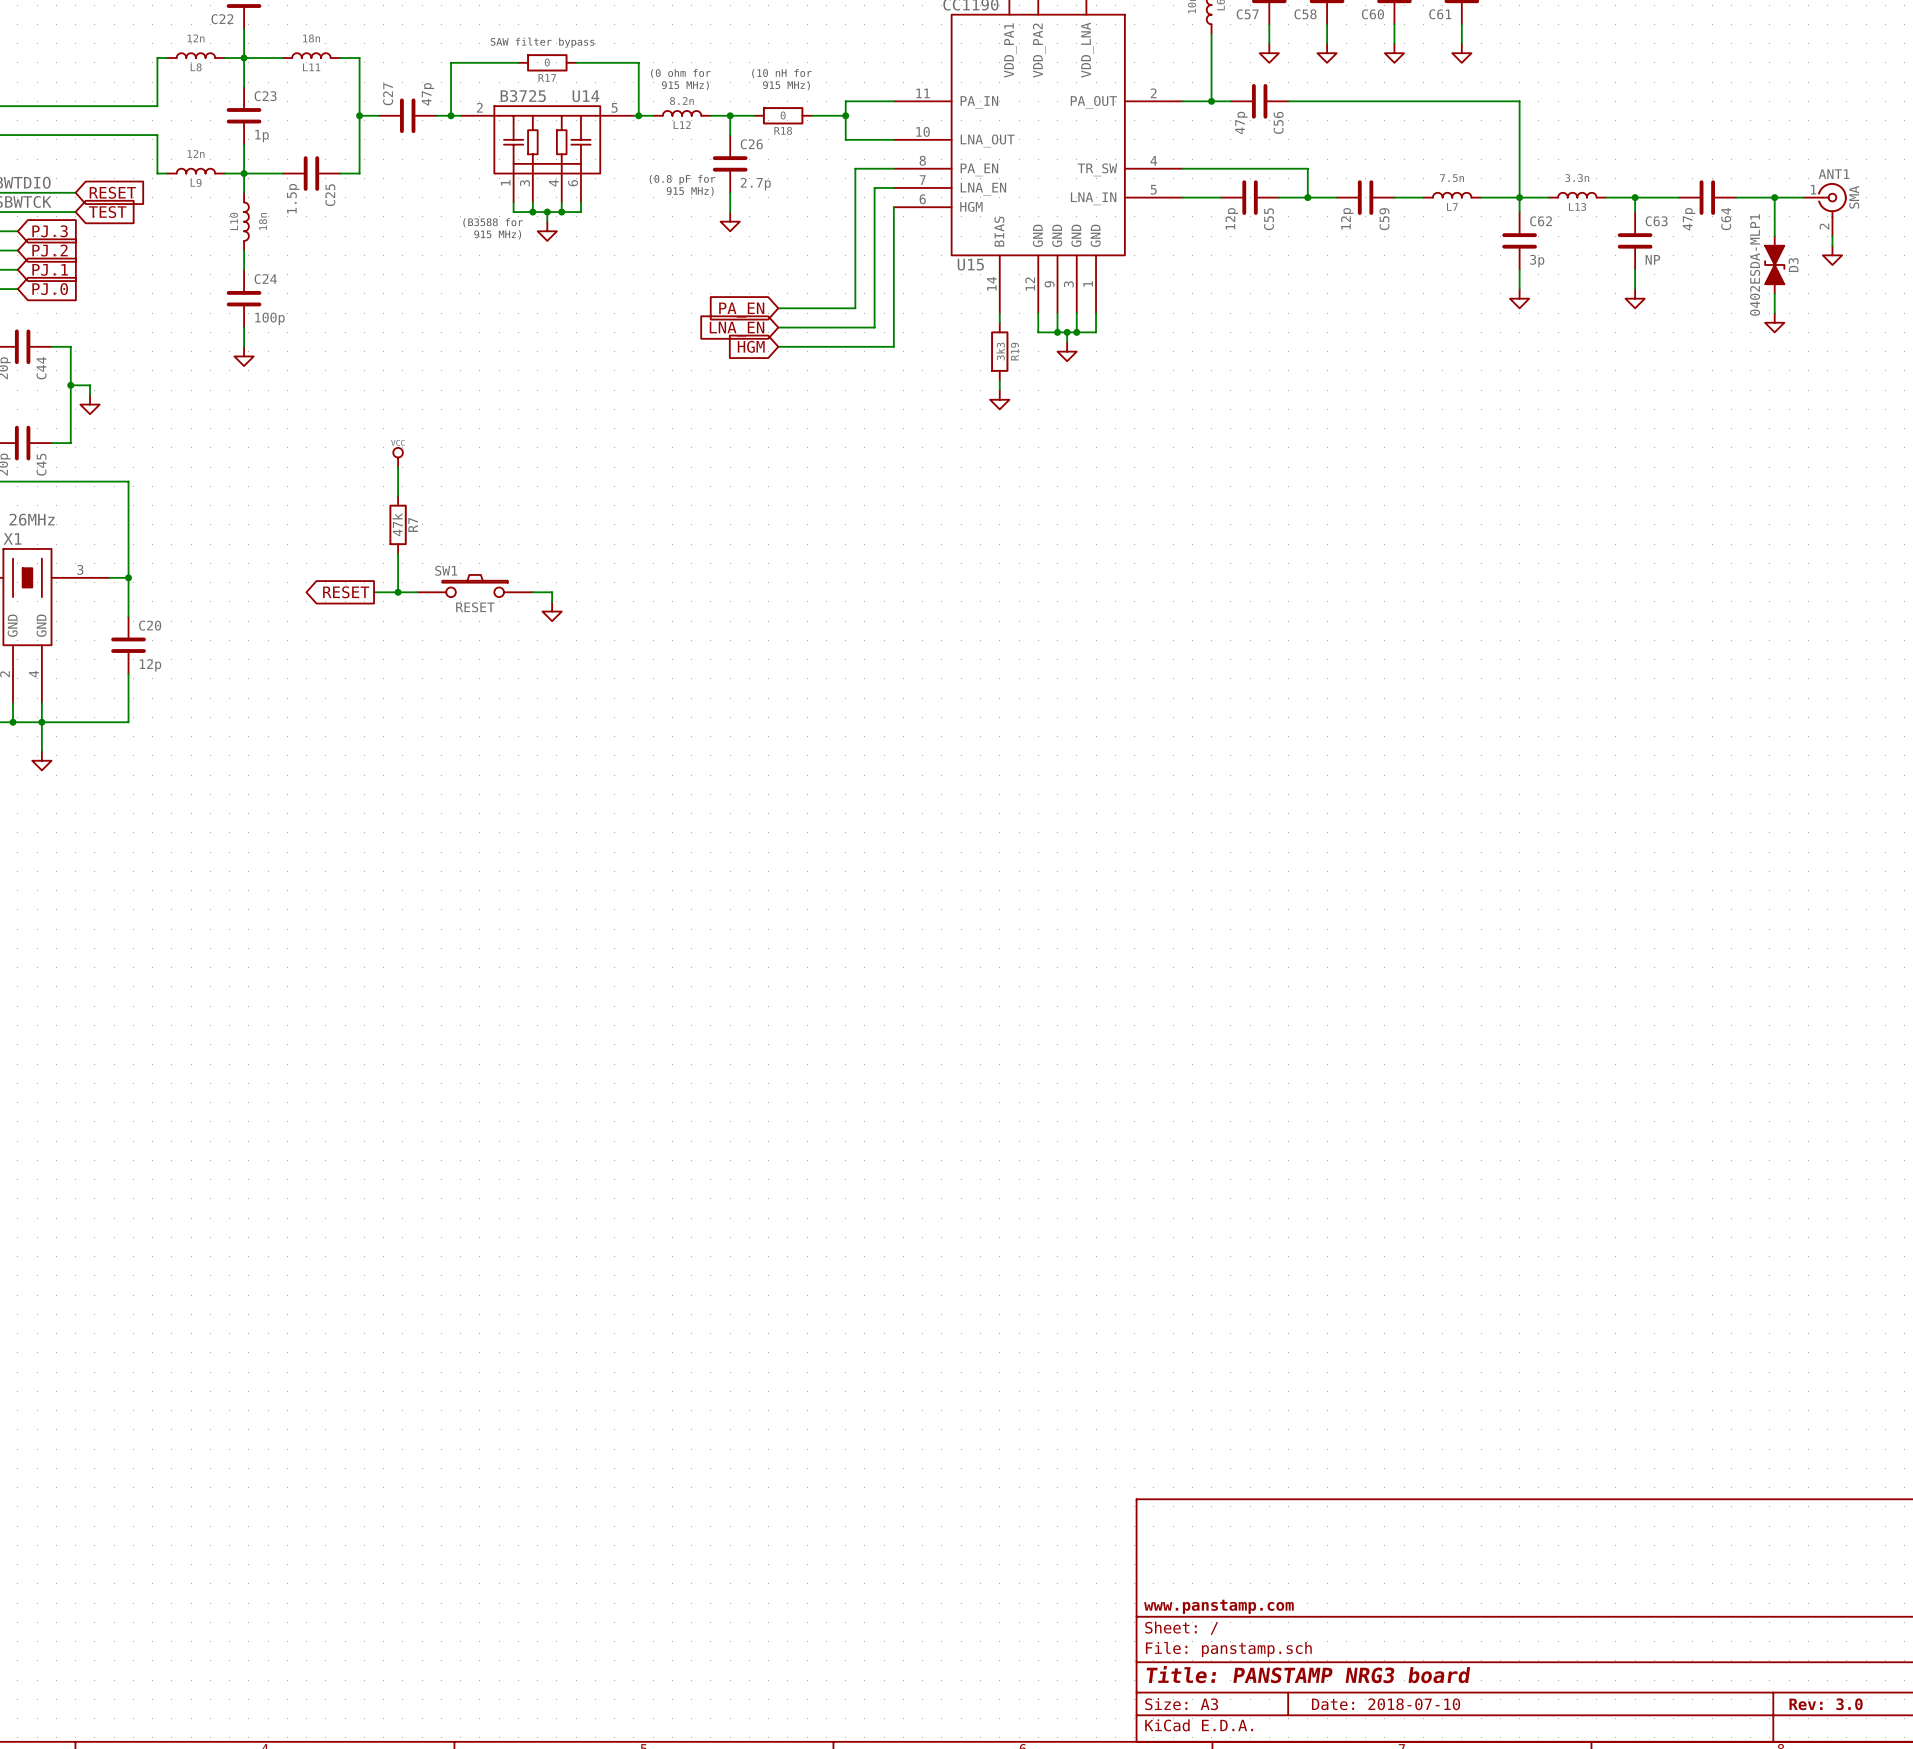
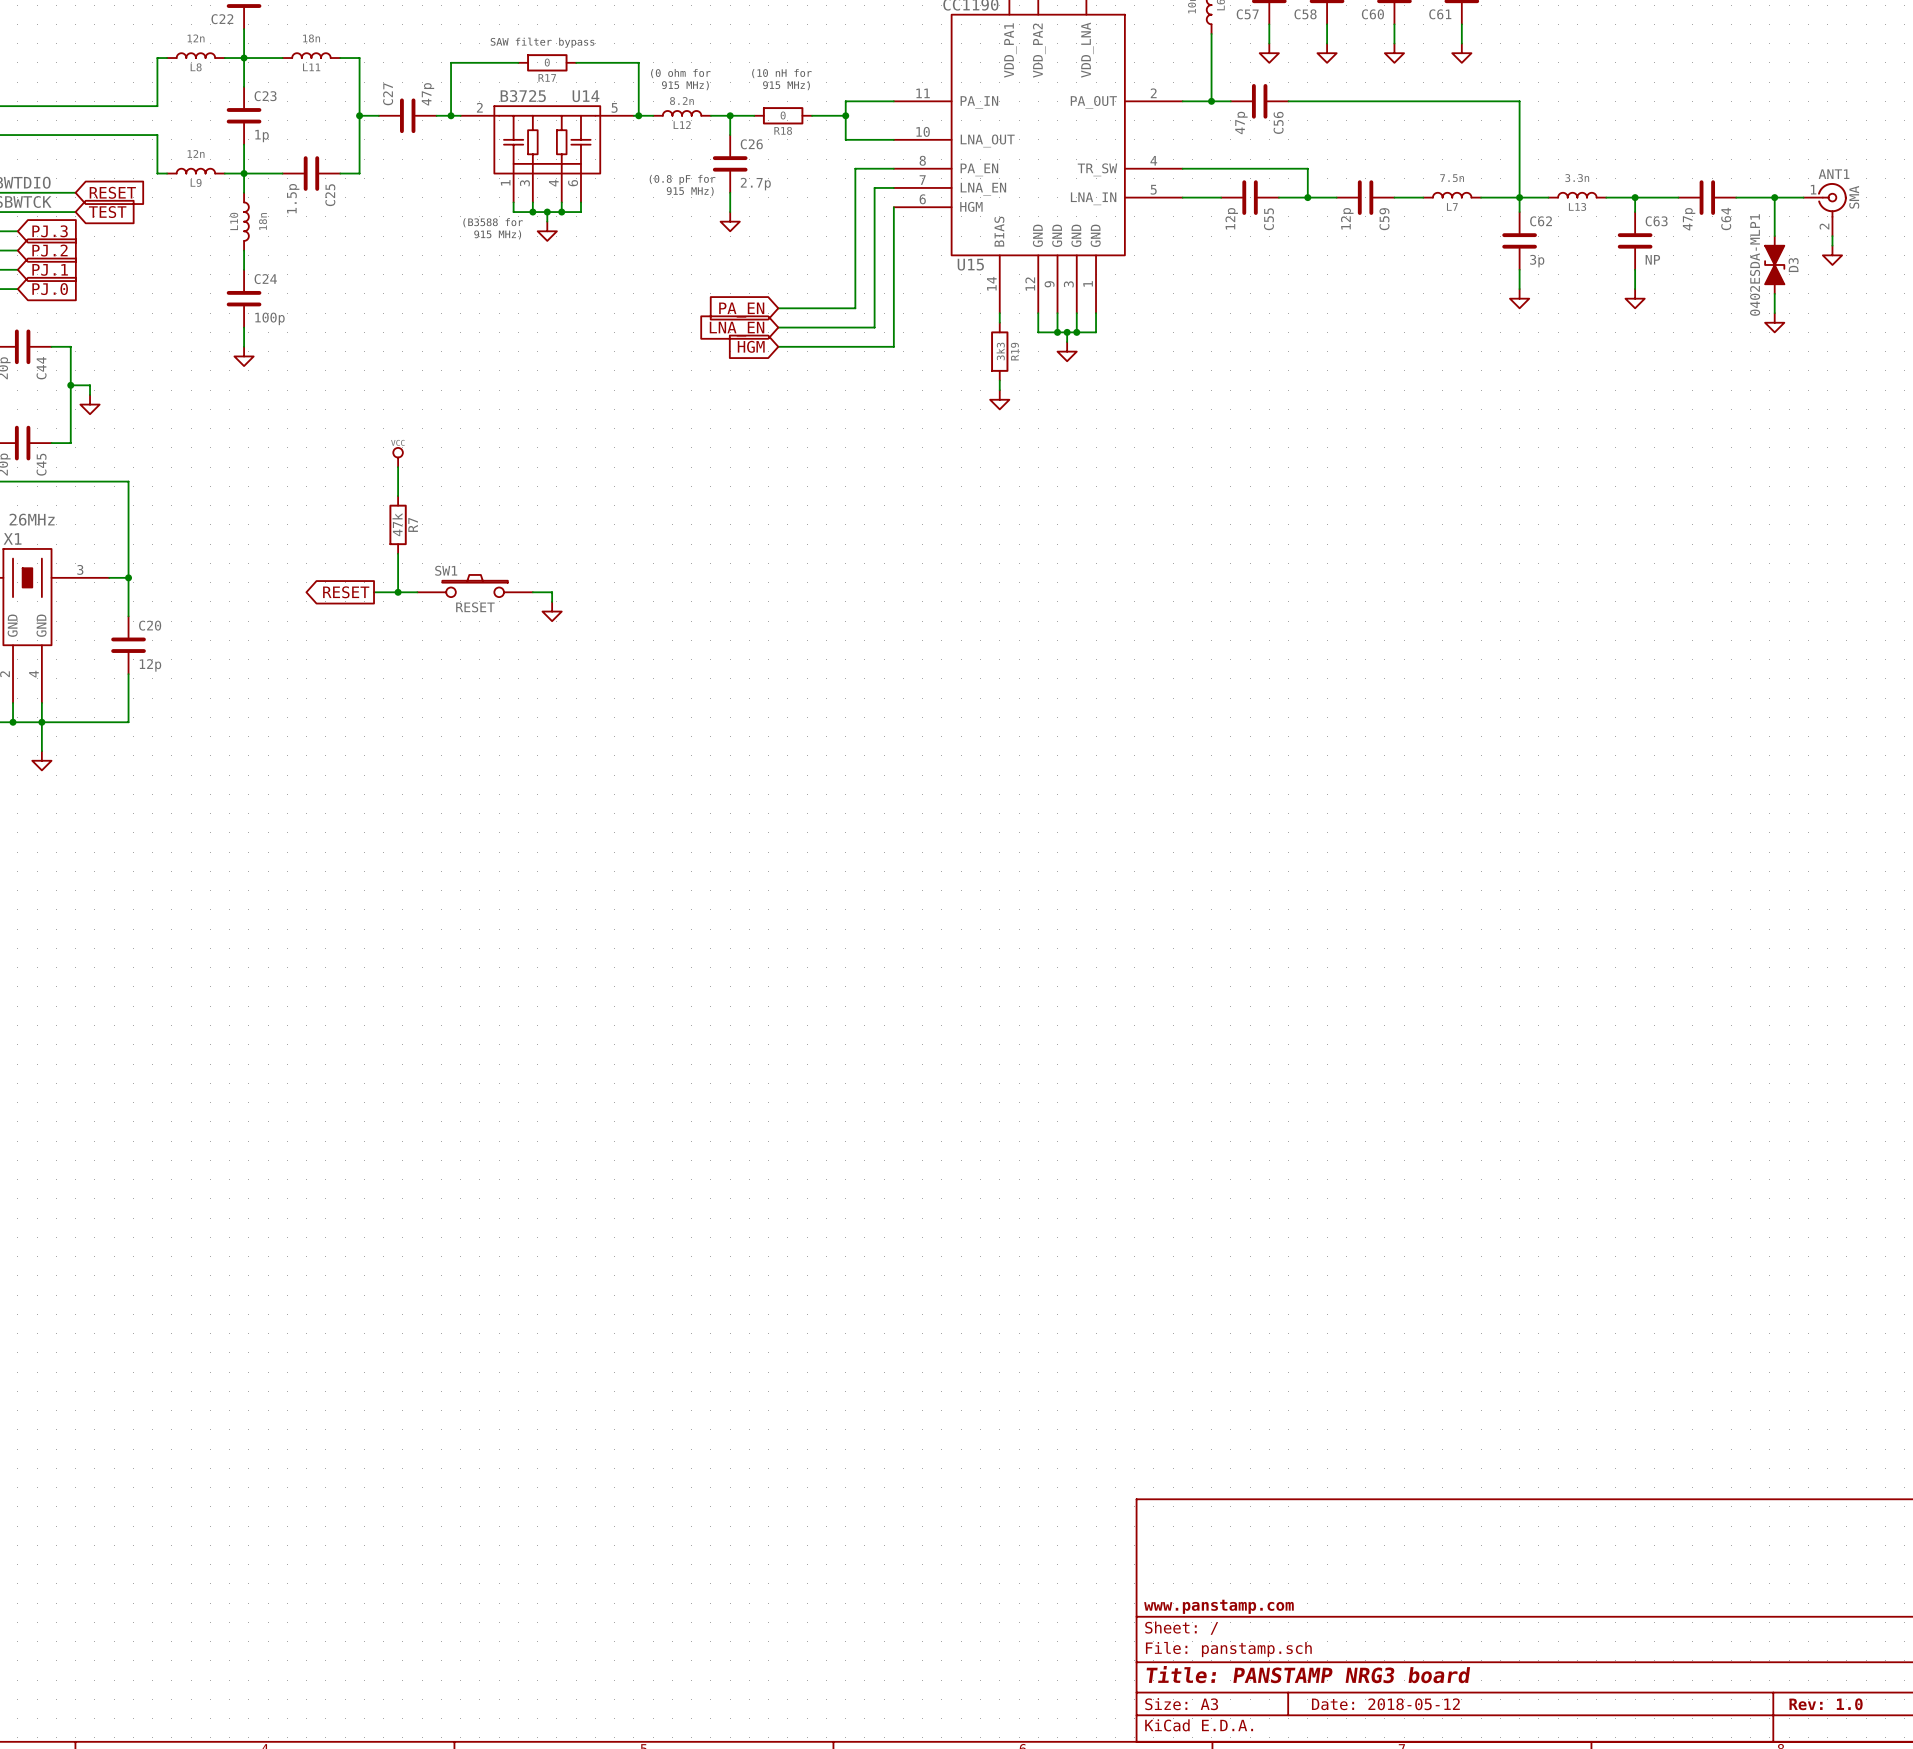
title block: Date: 2018-07-10 (1386, 1704) -> Date: 2018-05-12 (1385, 1704)
title block: Rev: 3.0 (1826, 1704) -> Rev: 1.0 (1826, 1704)

